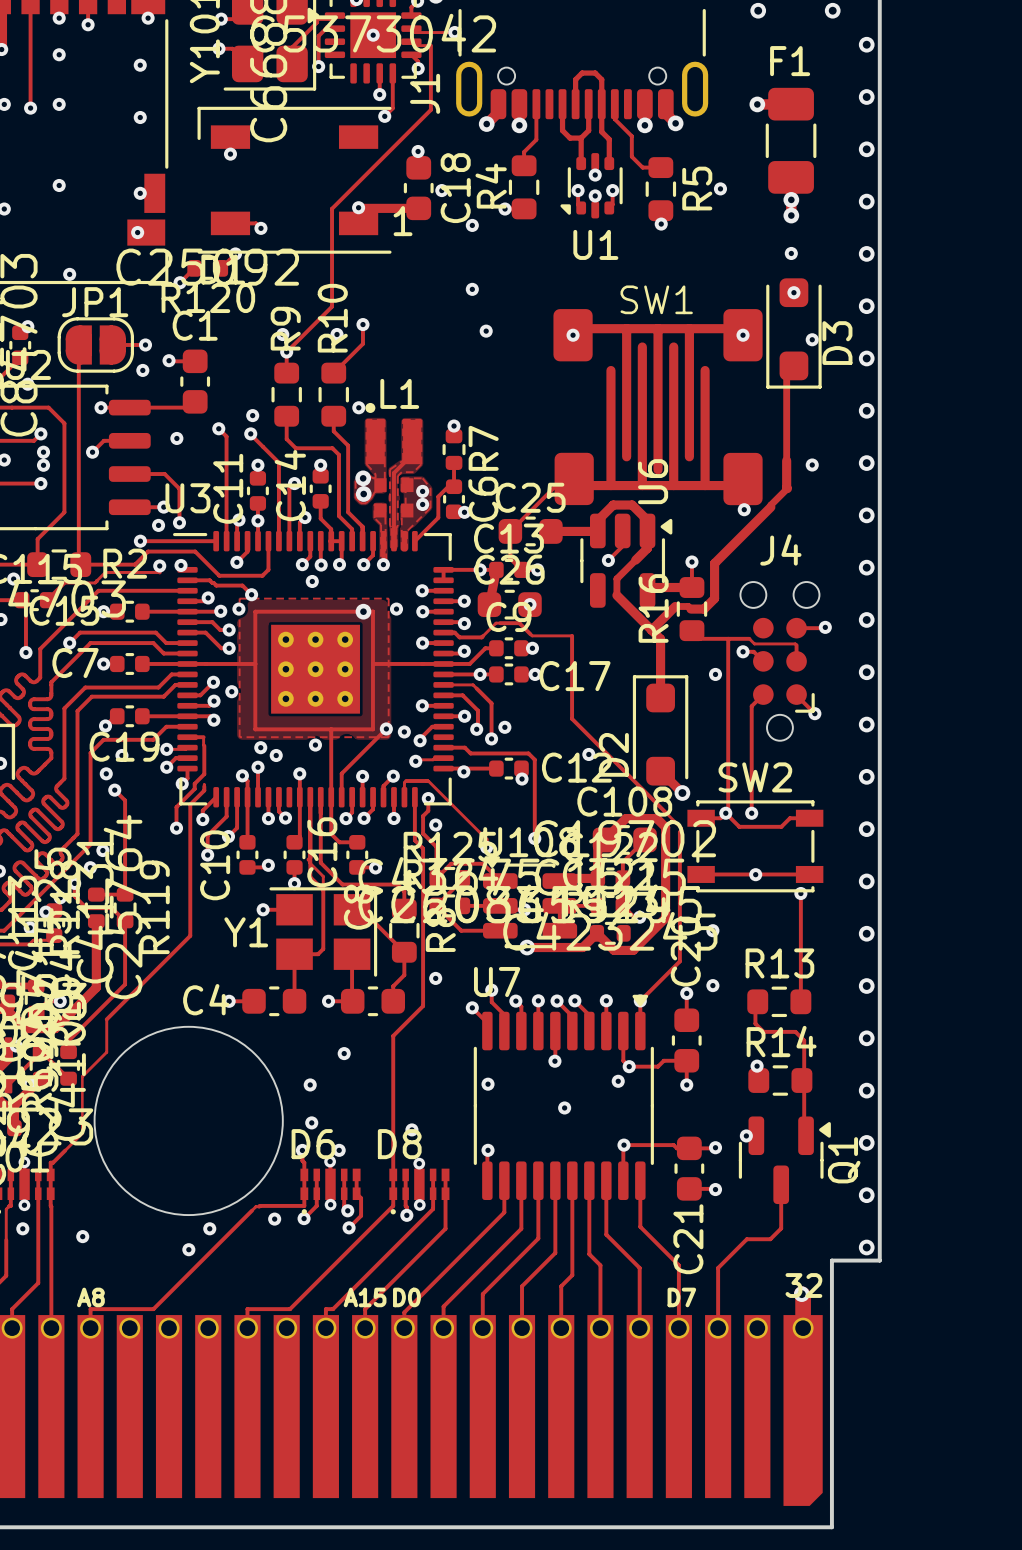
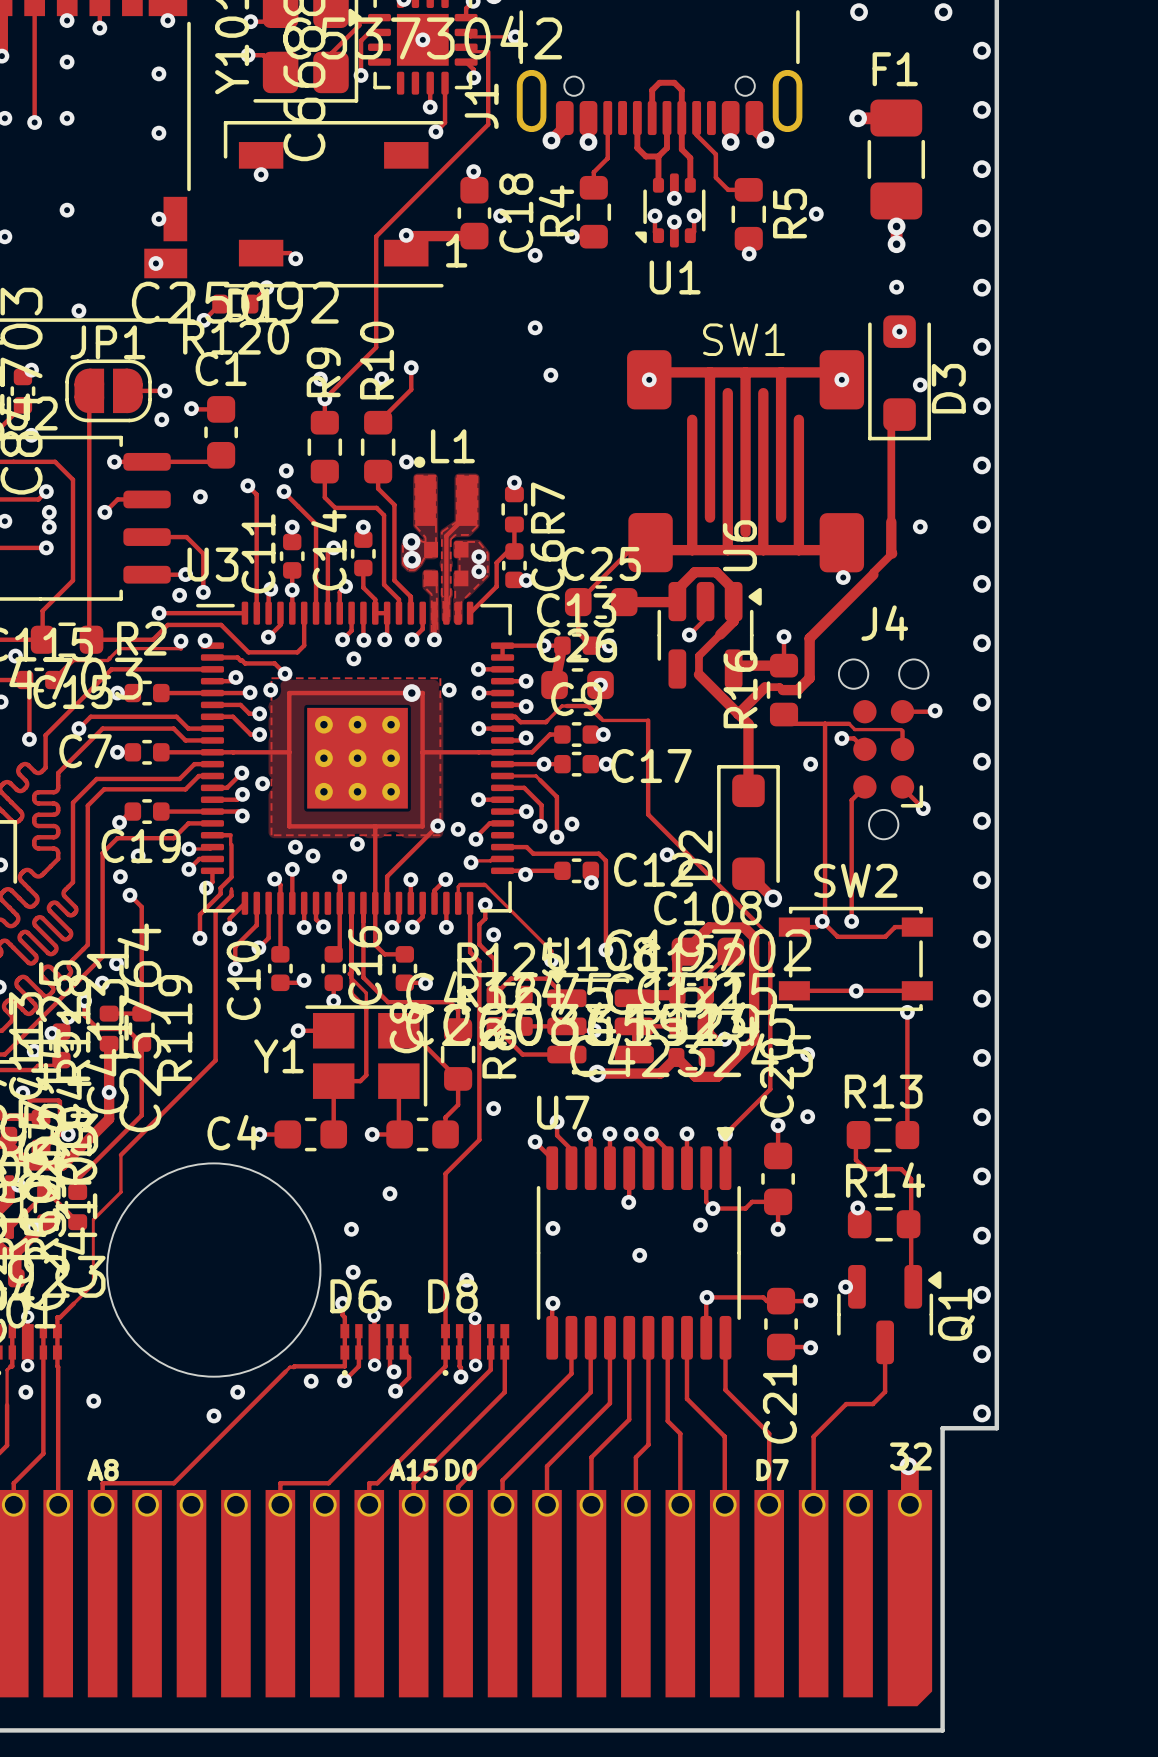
track: none -> (22, 1093) (30, 1100) (59, 1101) (59, 1133) (45, 1147) (41, 1147)
via: none -> (22, 1093)
via: none -> (109, 1092)

